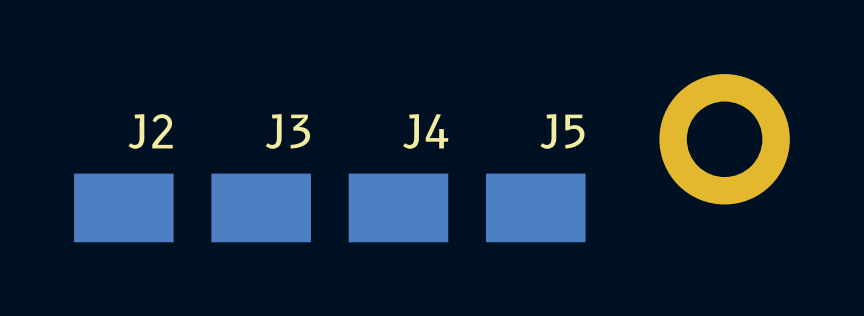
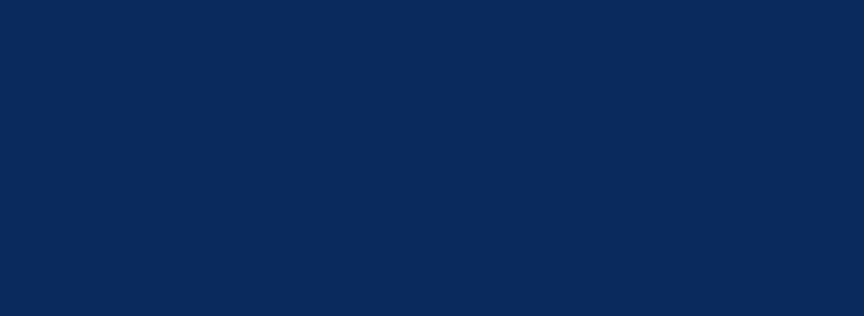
part: (724, 139) -> none
J2: (123, 207) -> none
J3: (261, 207) -> none
J4: (398, 207) -> none
J5: (535, 207) -> none

